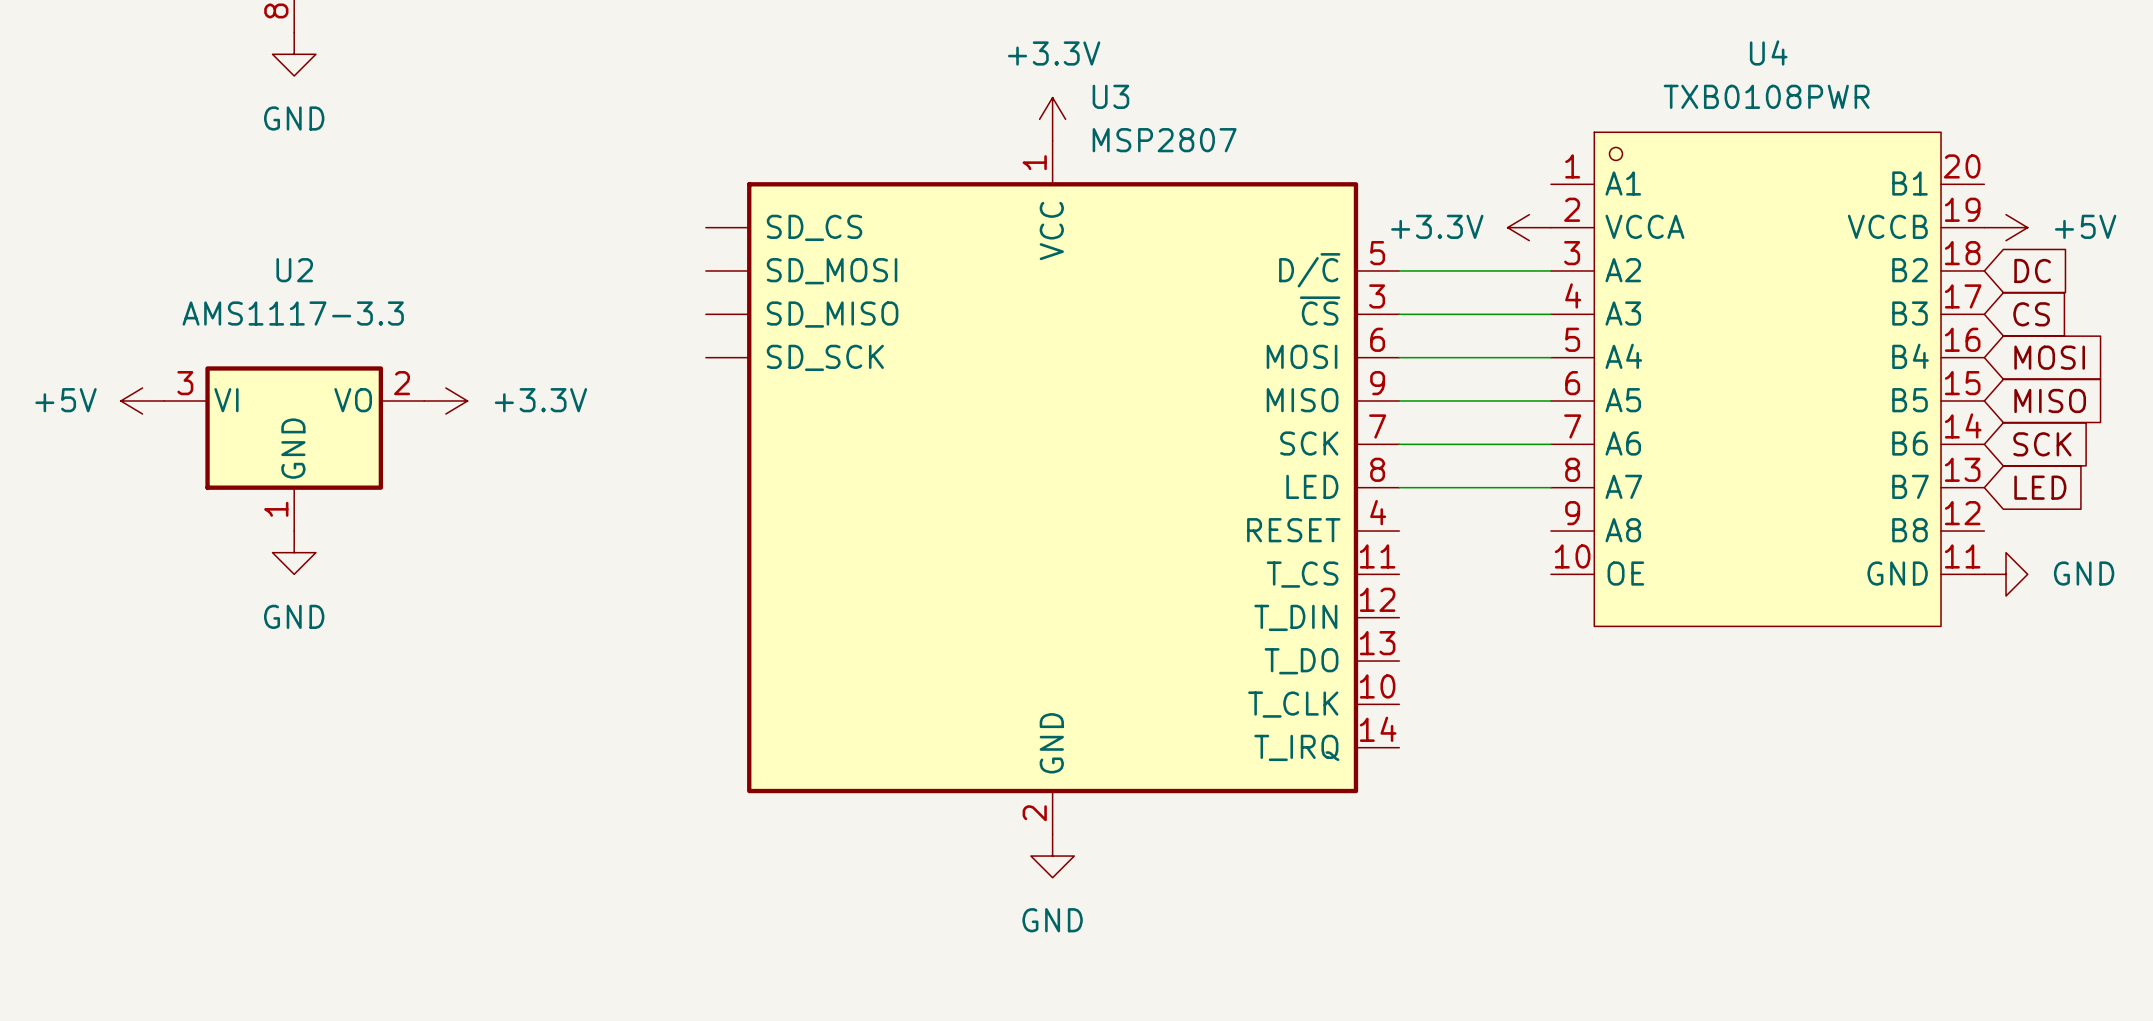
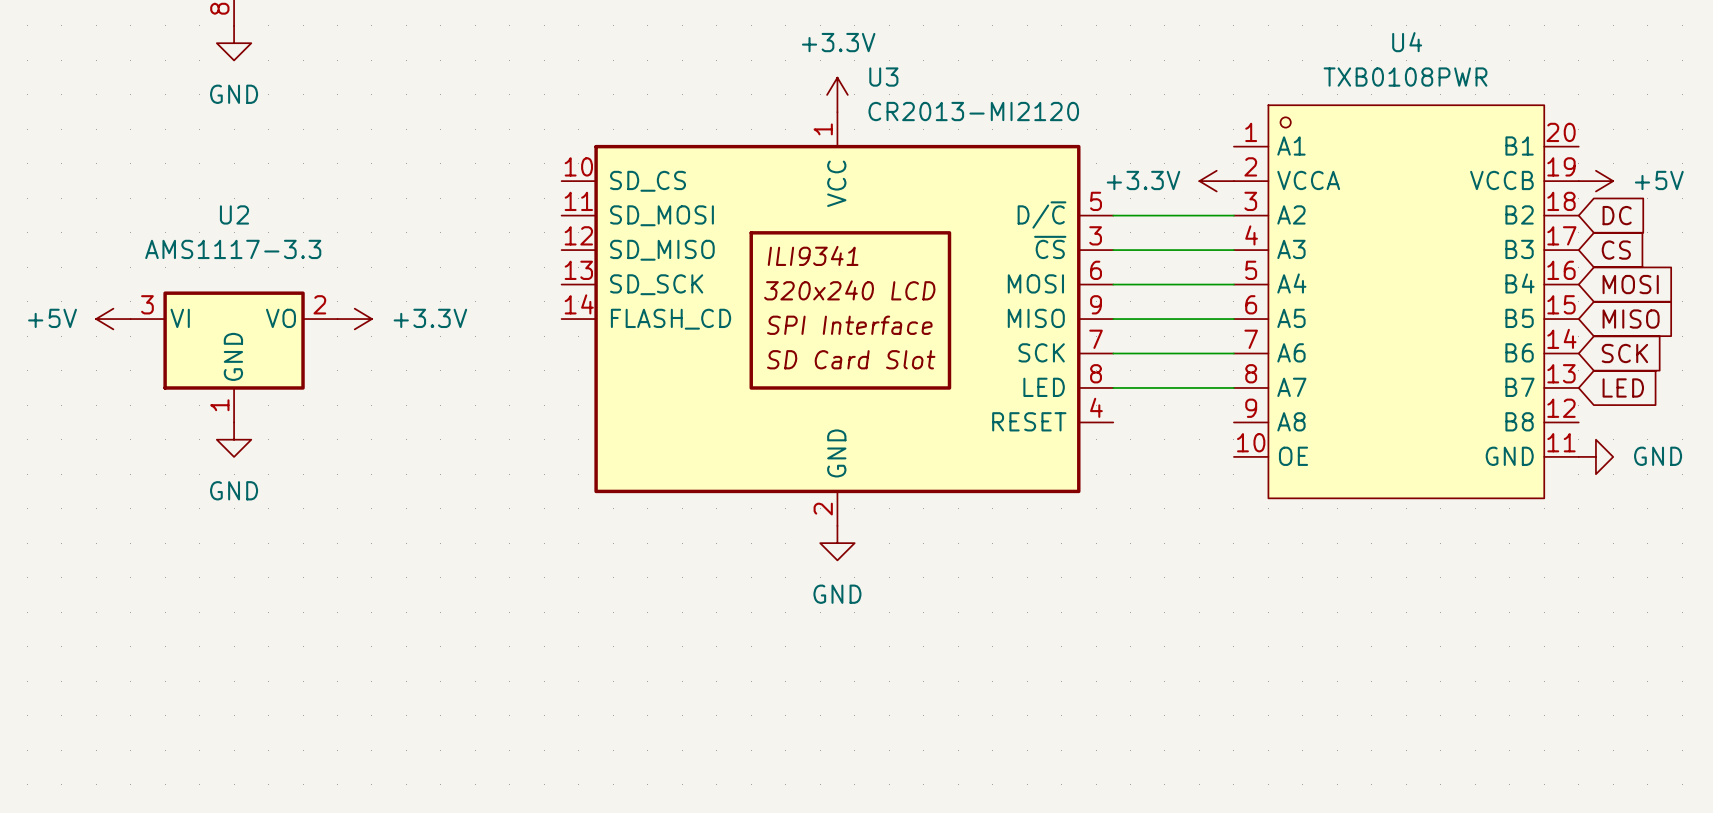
U3 symbol: [705, 140, 1400, 835] -> [561, 112, 1114, 526]
U3 value: MSP2807 (1164, 140) -> CR2013-MI2120 (973, 111)
power symbol position: GND (1052, 856) -> GND (837, 543)

